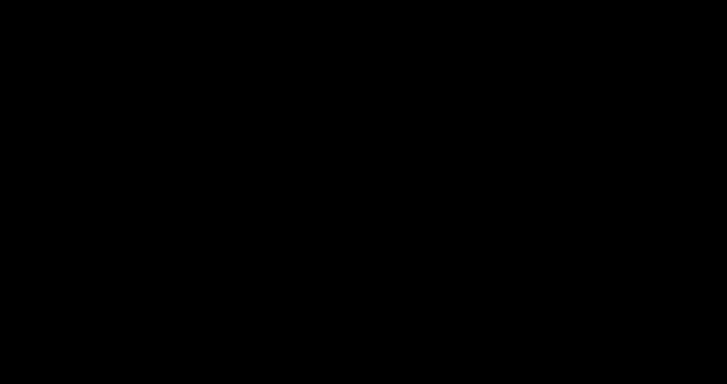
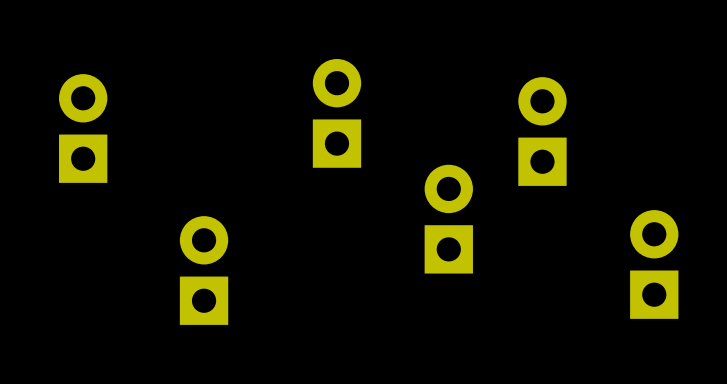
part: none -> (336, 113)
part: none -> (83, 128)
part: none -> (542, 131)
part: none -> (448, 219)
part: none -> (654, 264)
part: none -> (204, 270)

